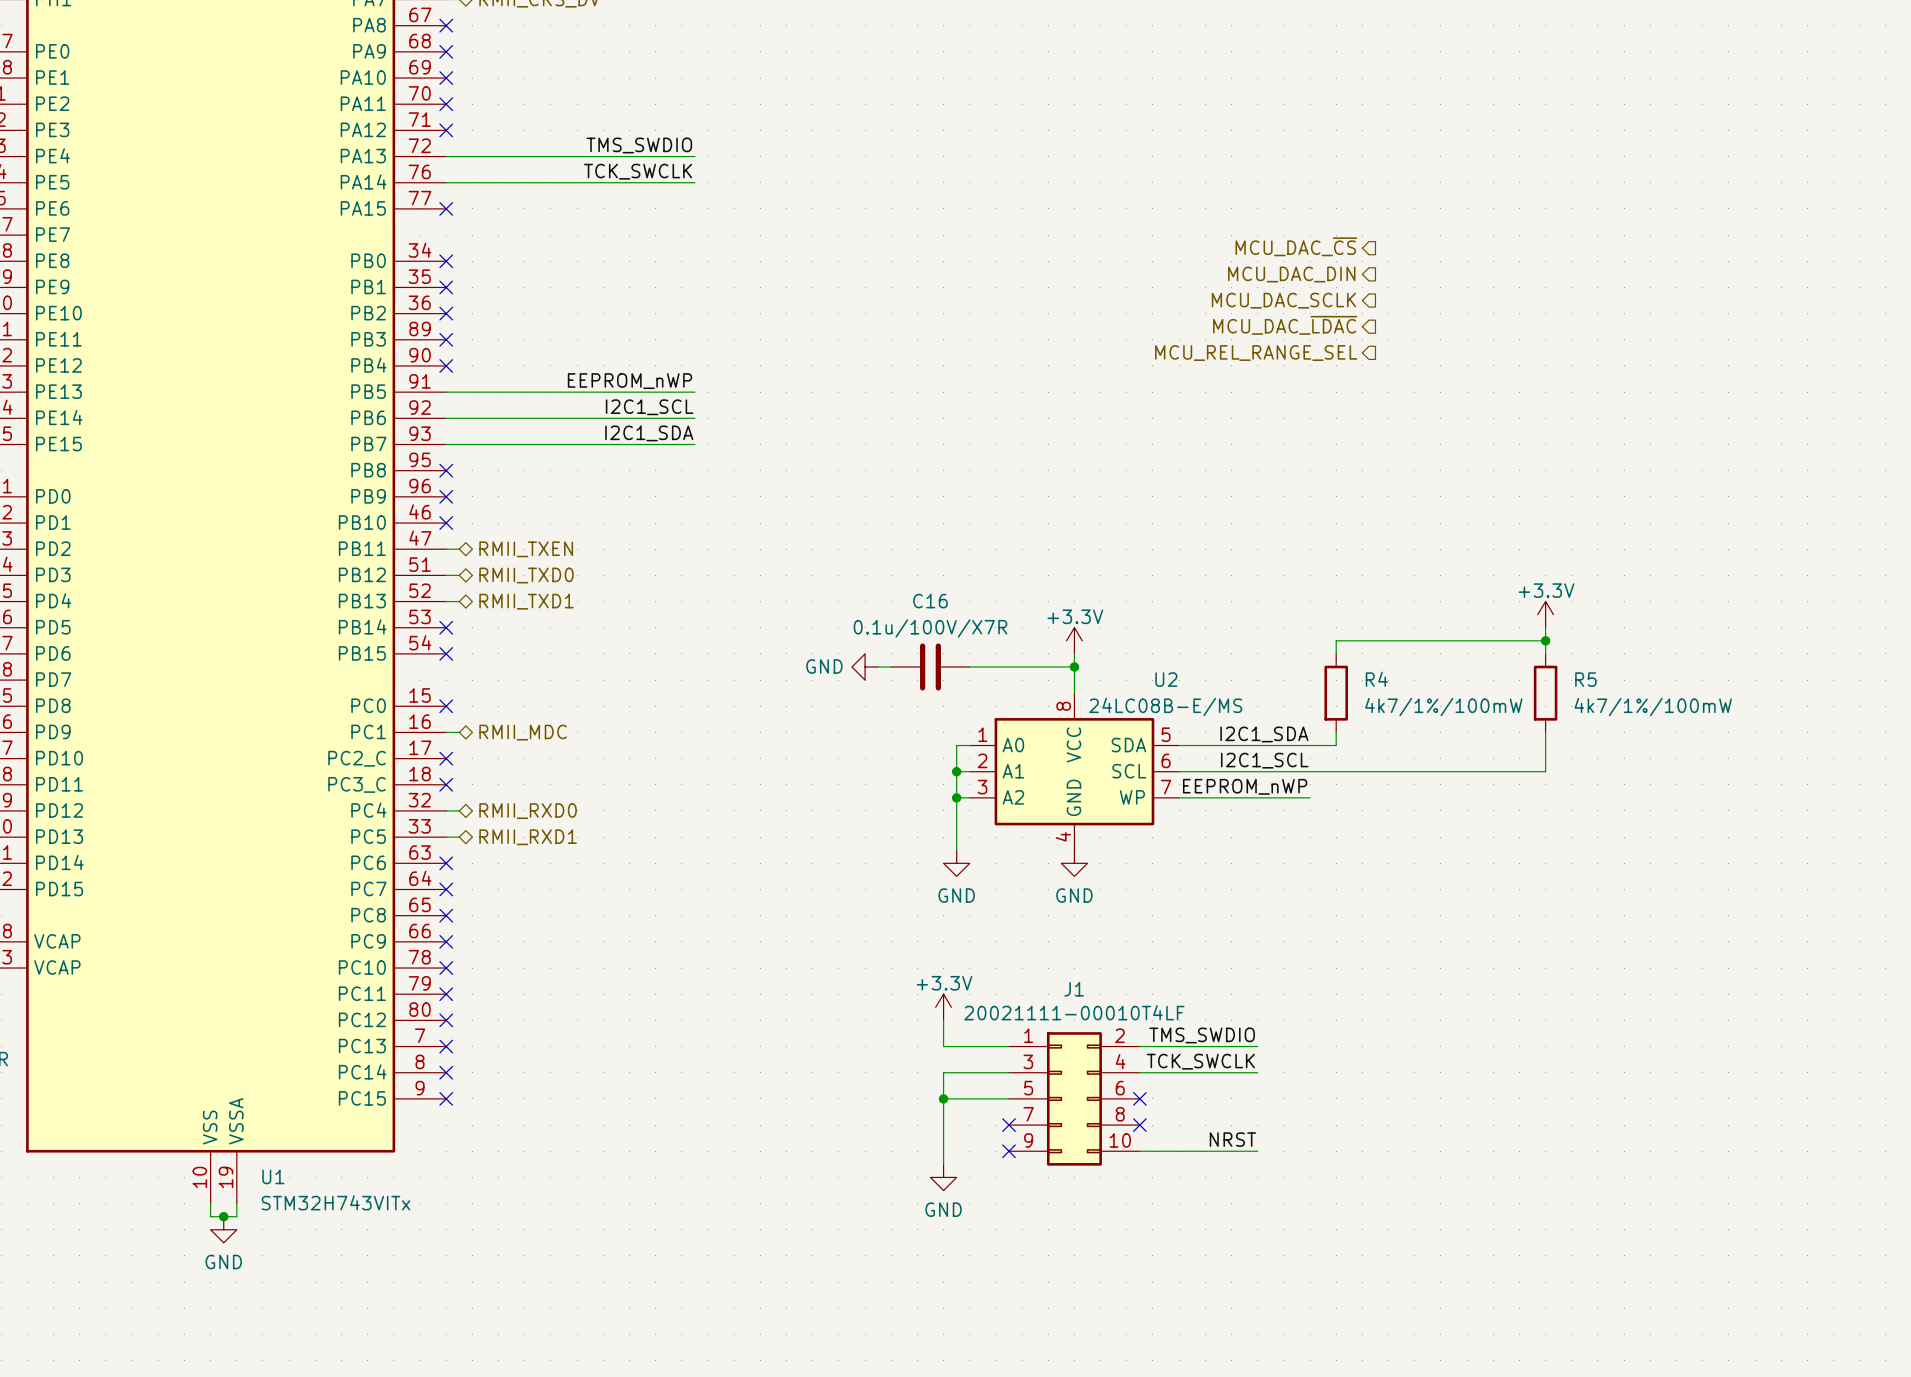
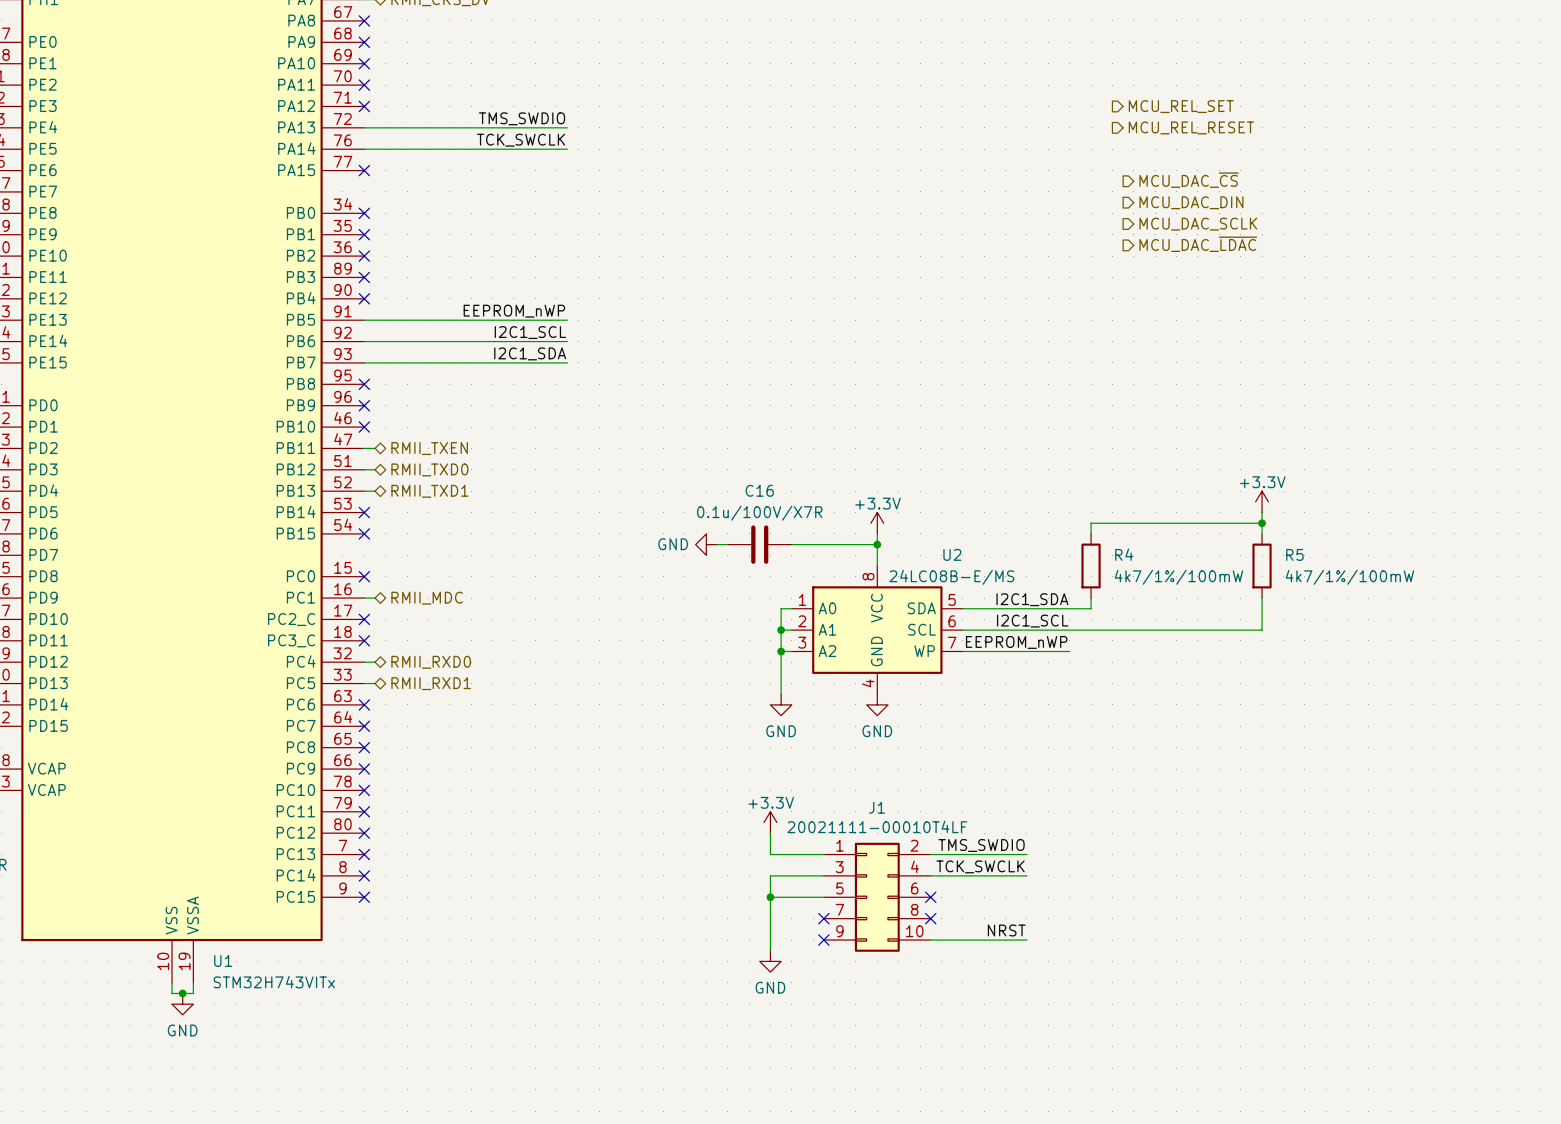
hierarchical label: none -> MCU_REL_SET (1181, 106)
hierarchical label: none -> MCU_REL_RESET (1191, 127)
hierarchical label rotation: 0° (1296, 246) -> 180° (1189, 180)
hierarchical label position: MCU_DAC_~{CS} (1296, 246) -> MCU_DAC_~{CS} (1189, 180)
hierarchical label rotation: 0° (1291, 274) -> 180° (1191, 202)
hierarchical label position: MCU_DAC_DIN (1291, 274) -> MCU_DAC_DIN (1191, 202)
hierarchical label rotation: 0° (1283, 300) -> 180° (1198, 224)
hierarchical label position: MCU_DAC_SCLK (1283, 300) -> MCU_DAC_SCLK (1198, 224)
hierarchical label rotation: 0° (1285, 325) -> 180° (1198, 244)
hierarchical label position: MCU_DAC_~{LDAC} (1285, 325) -> MCU_DAC_~{LDAC} (1198, 244)
hierarchical label: MCU_REL_RANGE_SEL (1256, 353) -> none

